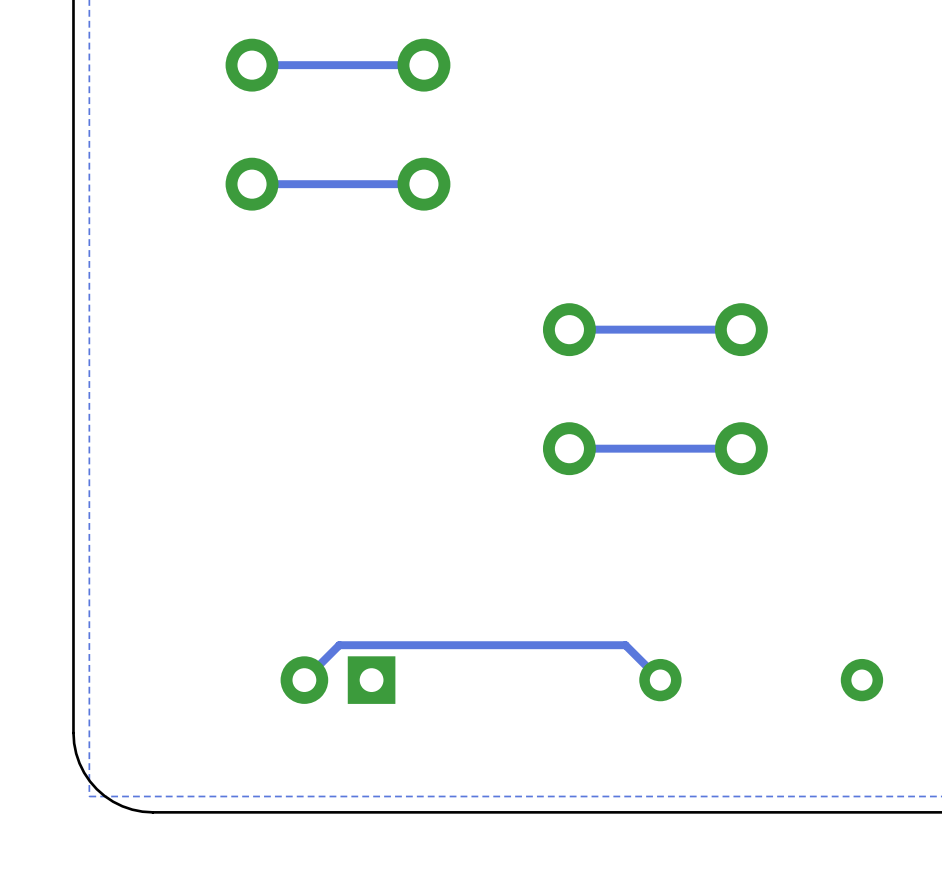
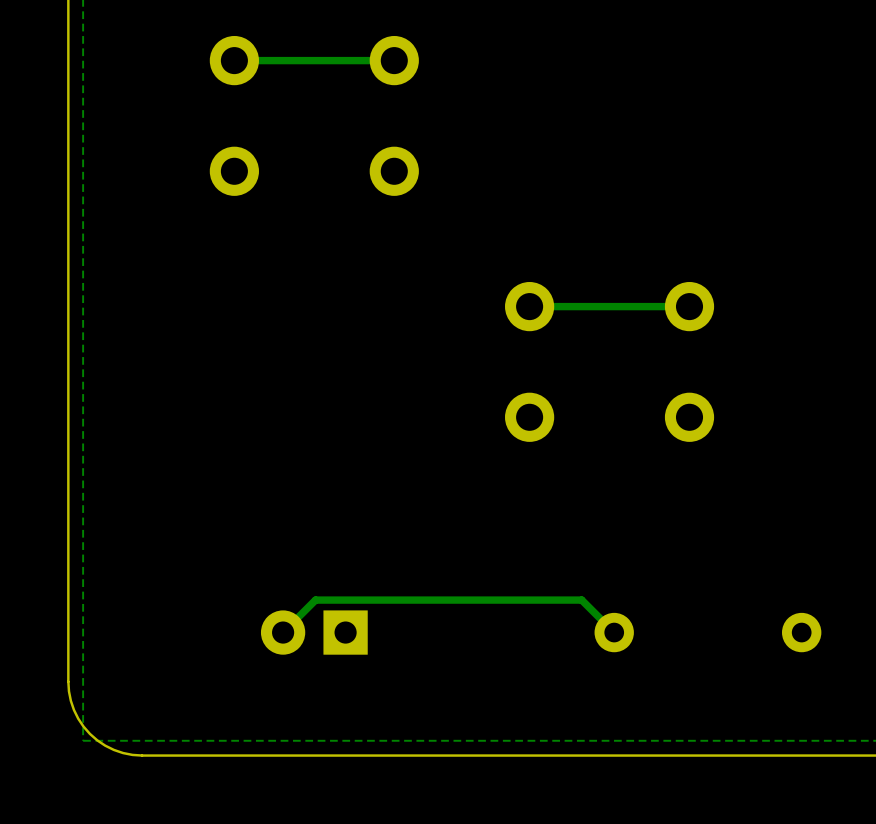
track: (423, 184) (252, 184) -> none
track: (741, 448) (569, 448) -> none

